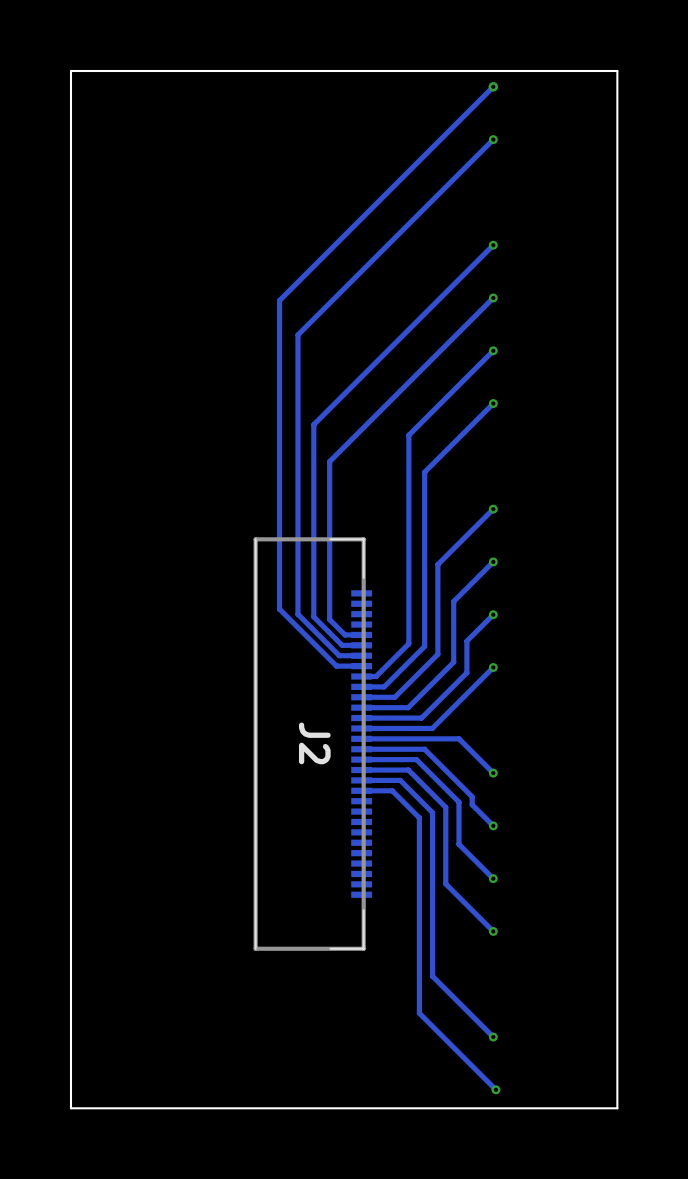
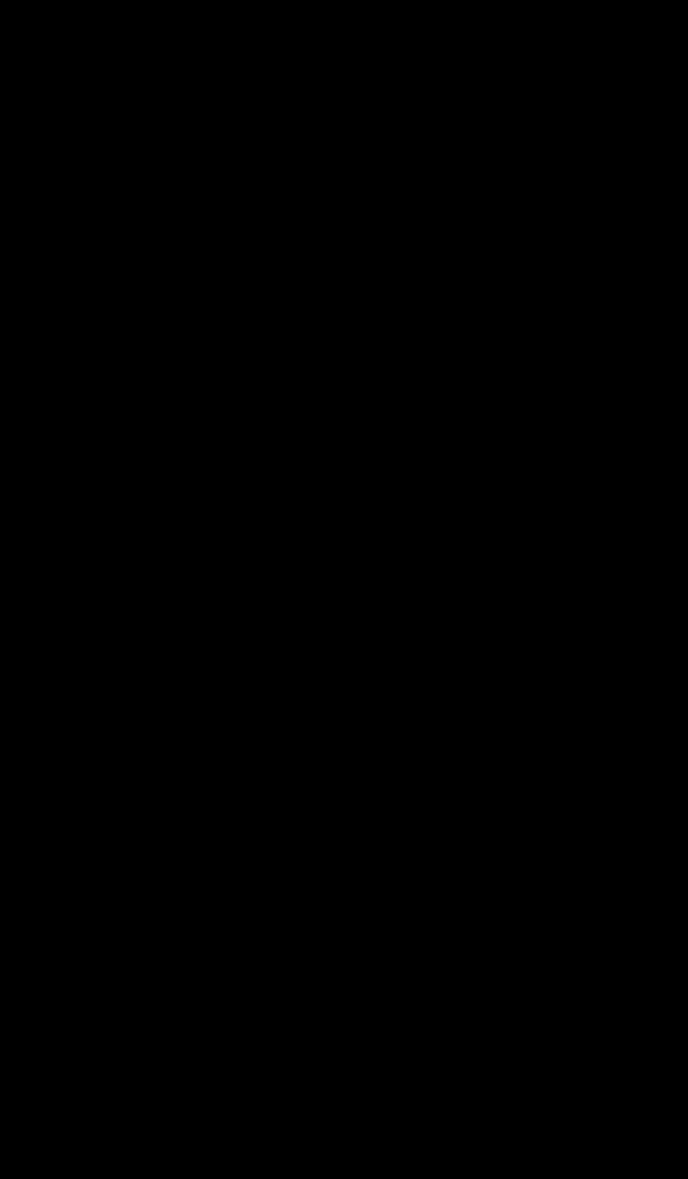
board edge: (617, 70) (70, 70) (70, 1108) (617, 1108) (617, 70) -> none
track: (493, 86) (279, 300) (279, 609) (336, 666) (361, 666) -> none
via: (493, 86) -> none
track: (493, 139) (297, 334) (297, 614) (339, 655) (361, 655) -> none
via: (493, 139) -> none
track: (493, 245) (313, 424) (313, 616) (342, 645) (361, 645) -> none
via: (493, 245) -> none
track: (493, 297) (329, 461) (329, 619) (344, 634) (361, 634) -> none
via: (493, 297) -> none
track: (493, 350) (408, 435) (408, 643) (376, 676) (361, 676) -> none
via: (493, 350) -> none
track: (493, 403) (424, 472) (424, 646) (384, 686) (361, 686) -> none
via: (493, 403) -> none
track: (493, 509) (437, 564) (437, 654) (394, 697) (361, 697) -> none
via: (493, 509) -> none
track: (493, 561) (453, 601) (453, 662) (408, 707) (361, 707) -> none
via: (493, 561) -> none
track: (493, 614) (466, 641) (466, 672) (421, 718) (361, 718) -> none
via: (493, 614) -> none
track: (493, 667) (432, 728) (361, 728) -> none
via: (493, 667) -> none
track: (361, 738) (459, 738) (493, 773) -> none
J2: (312, 744) -> none
track: (361, 749) (424, 749) (472, 796) (472, 804) (493, 825) -> none
track: (361, 759) (416, 759) (458, 802) (458, 844) (493, 878) -> none
track: (361, 770) (408, 770) (445, 807) (445, 883) (493, 931) -> none
via: (493, 773) -> none
track: (361, 780) (400, 780) (432, 812) (432, 976) (493, 1037) -> none
track: (361, 790) (392, 790) (419, 817) (419, 1013) (495, 1089) -> none
via: (493, 825) -> none
via: (493, 878) -> none
via: (493, 931) -> none
via: (493, 1037) -> none
via: (495, 1089) -> none

